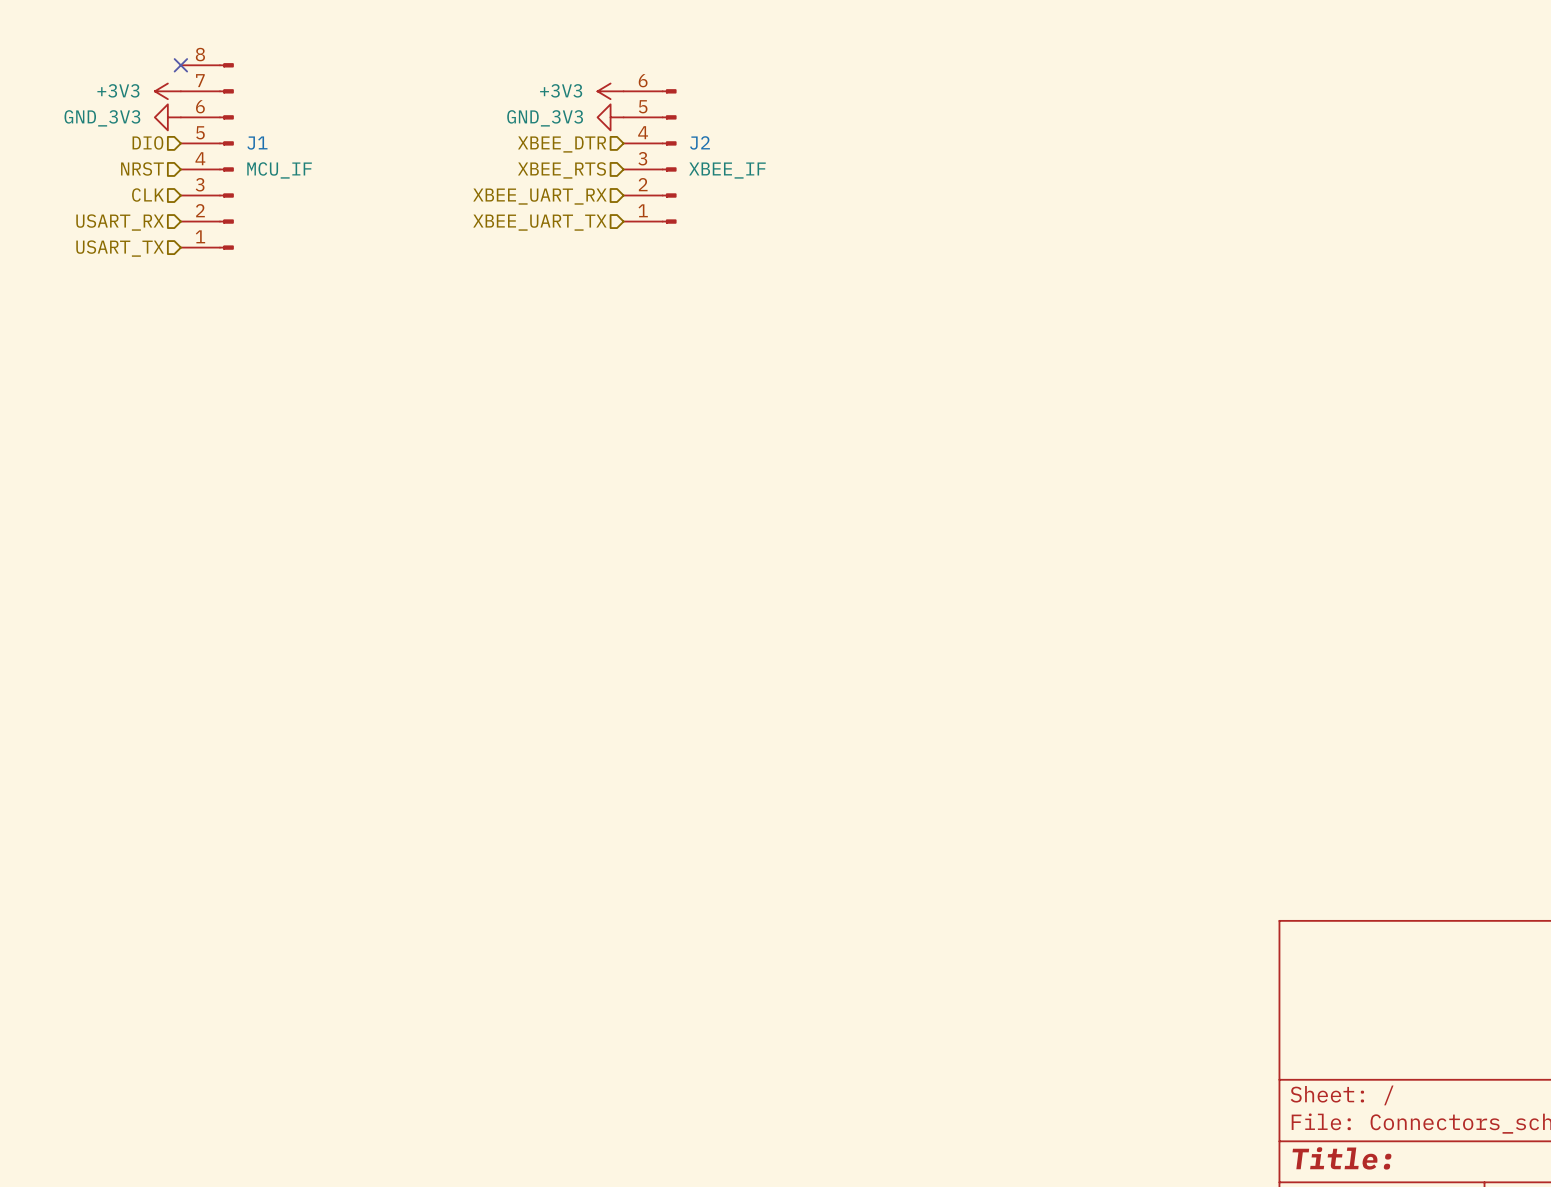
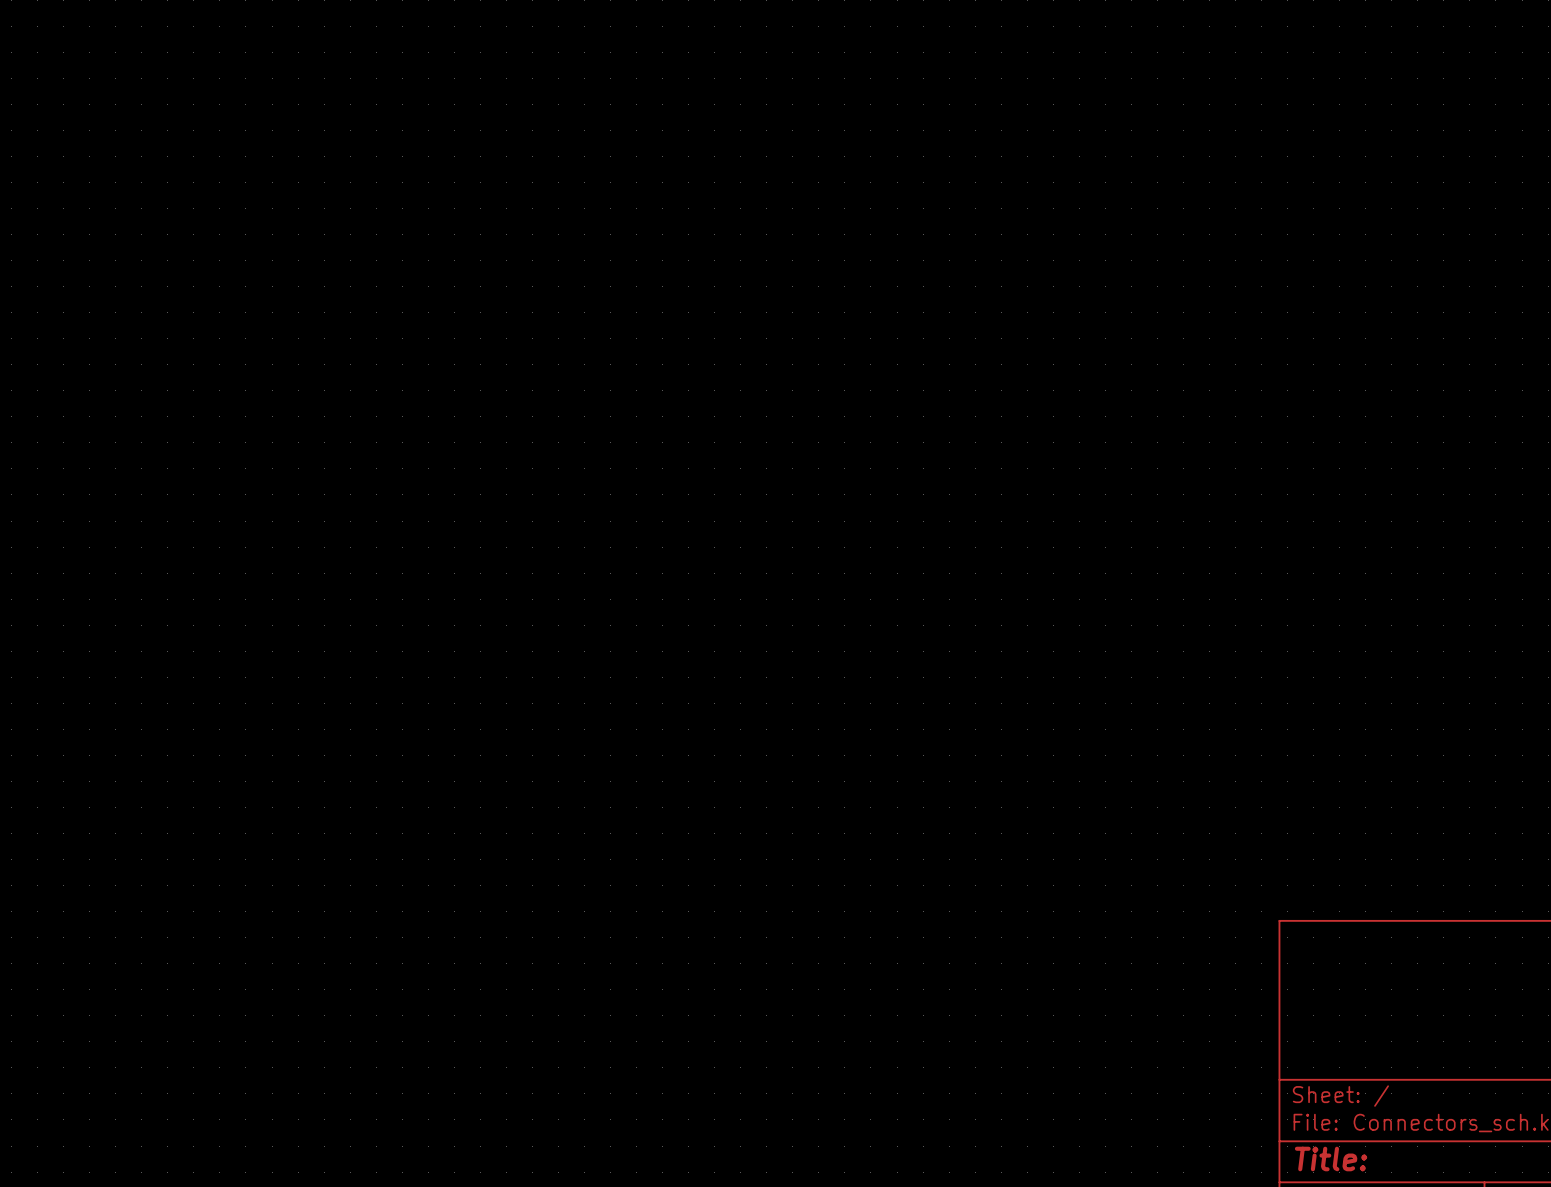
no-connect mark: (180, 65) -> none
power symbol: +3V3 (167, 91) -> none
power symbol: +3V3 (610, 91) -> none
power symbol: GND_3V3 (167, 117) -> none
power symbol: GND_3V3 (610, 117) -> none
hierarchical label: DIO (147, 142) -> none
hierarchical label: XBEE_DTR (562, 144) -> none
J1: MCU_IF (207, 156) -> none
J2: XBEE_IF (650, 156) -> none
hierarchical label: NRST (142, 168) -> none
hierarchical label: XBEE_RTS (561, 170) -> none
hierarchical label: CLK (148, 195) -> none
hierarchical label: XBEE_UART_RX (539, 196) -> none
hierarchical label: USART_RX (120, 222) -> none
hierarchical label: XBEE_UART_TX (539, 222) -> none
hierarchical label: USART_TX (120, 248) -> none

